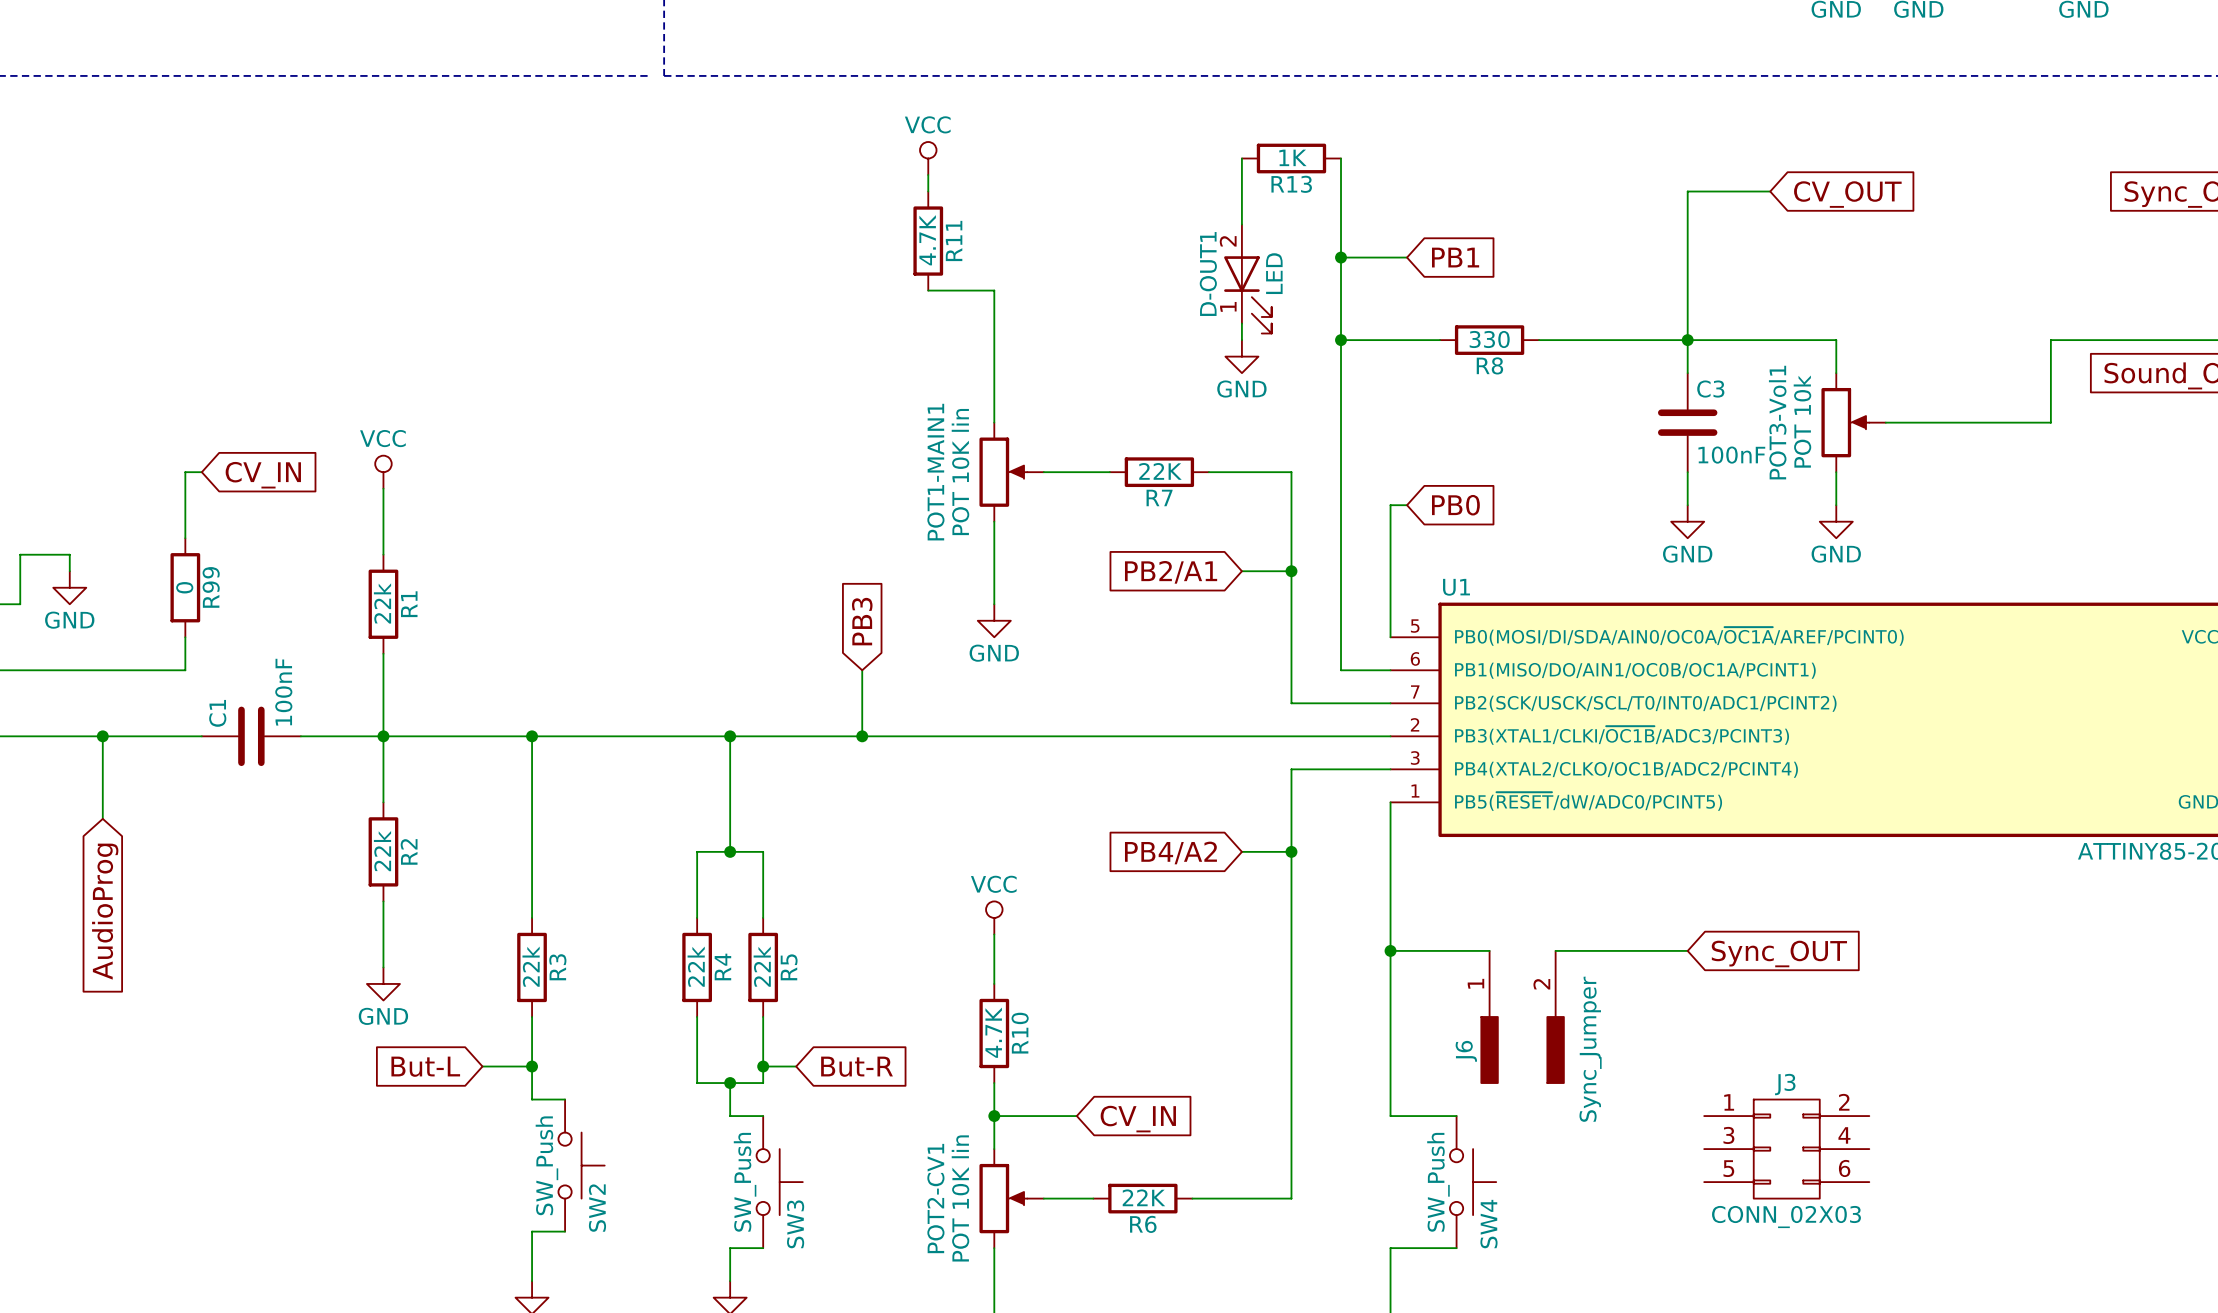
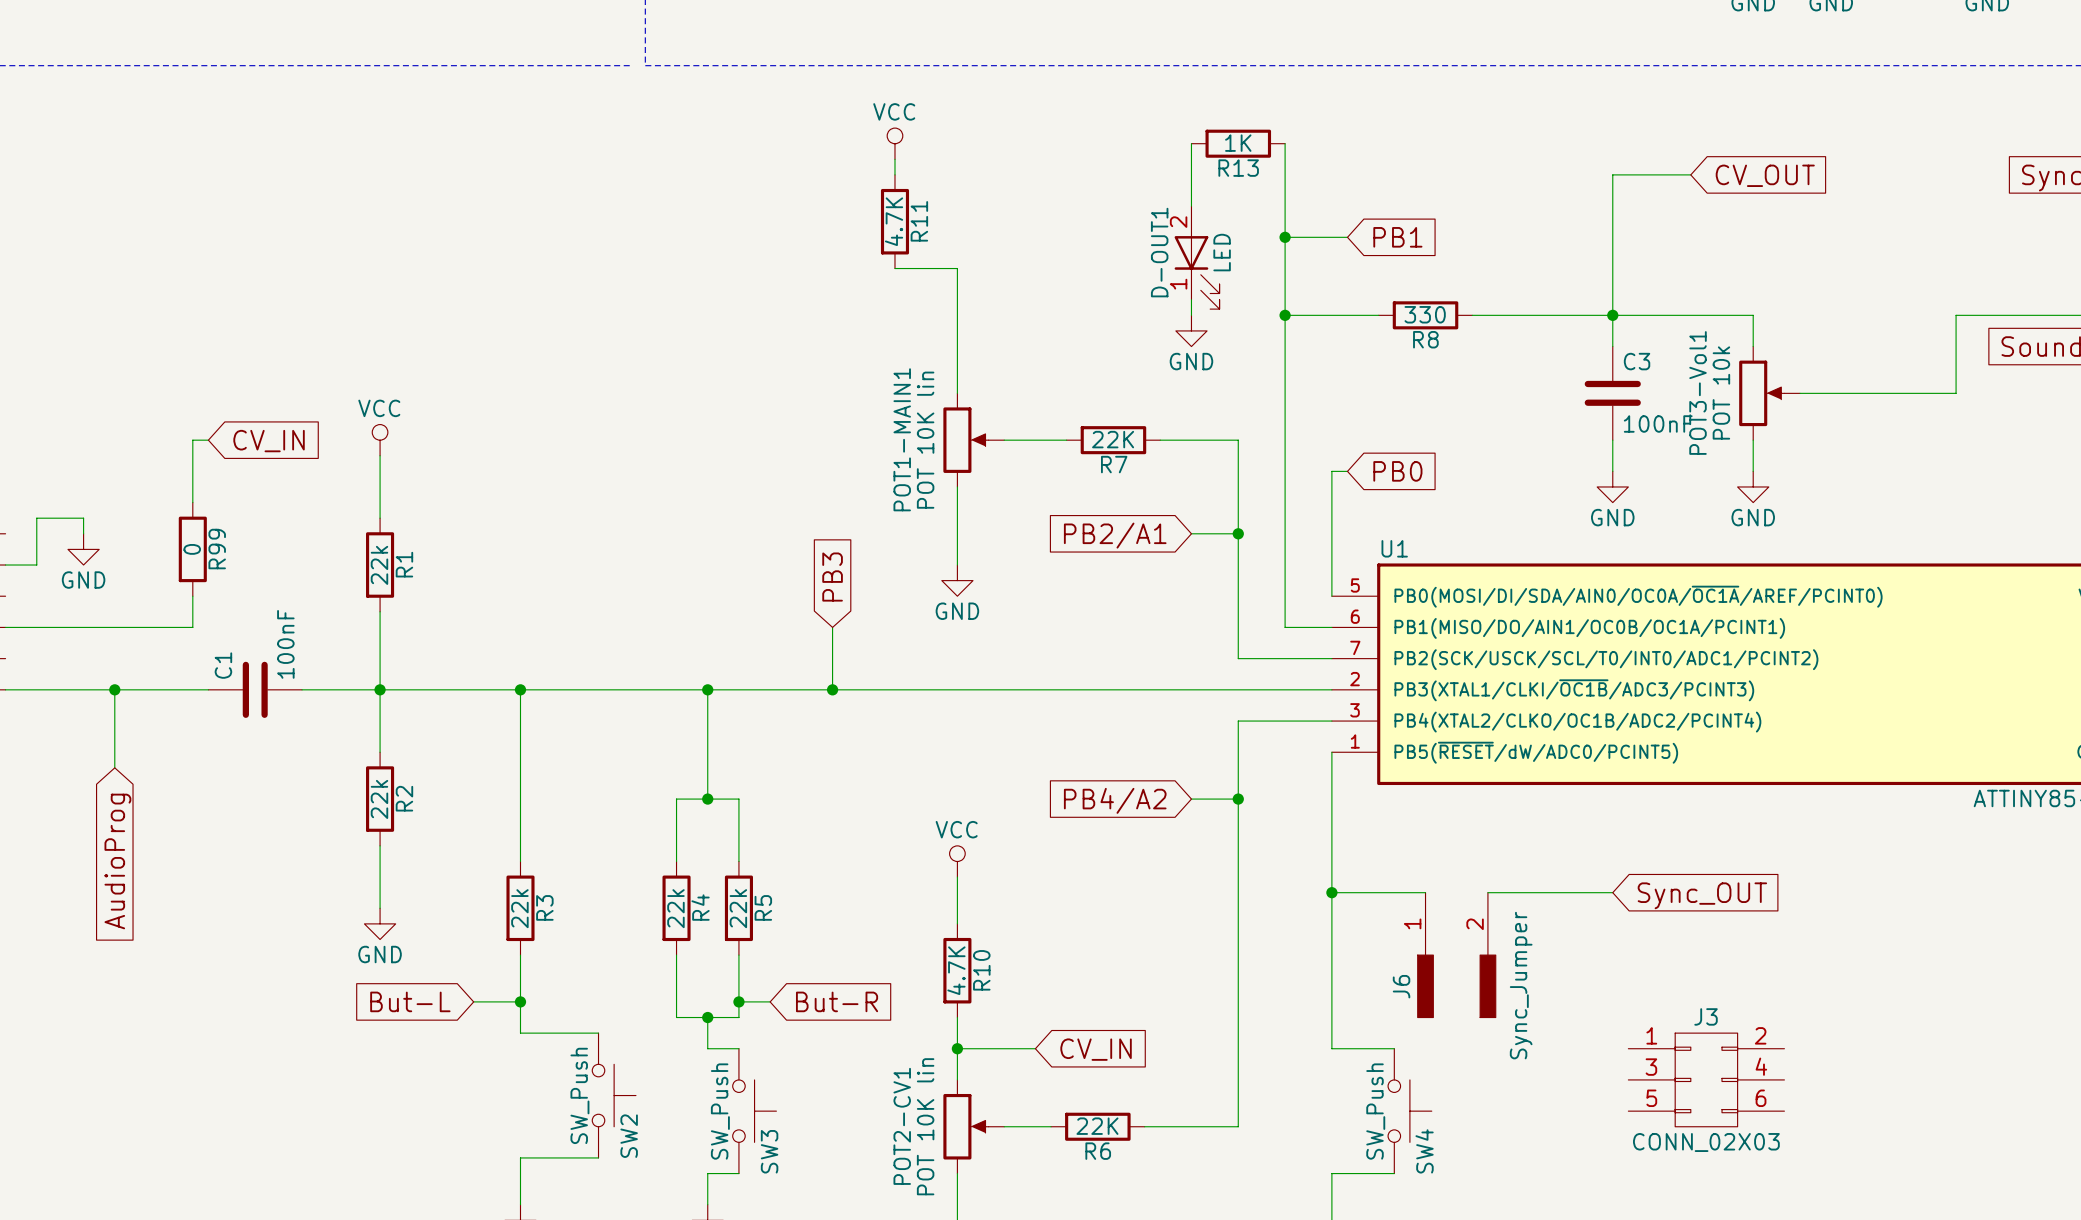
wire: none -> (551, 1033) (598, 1033)
SW2 position: (581, 1165) -> (614, 1095)
wire: none -> (551, 1157) (598, 1157)

